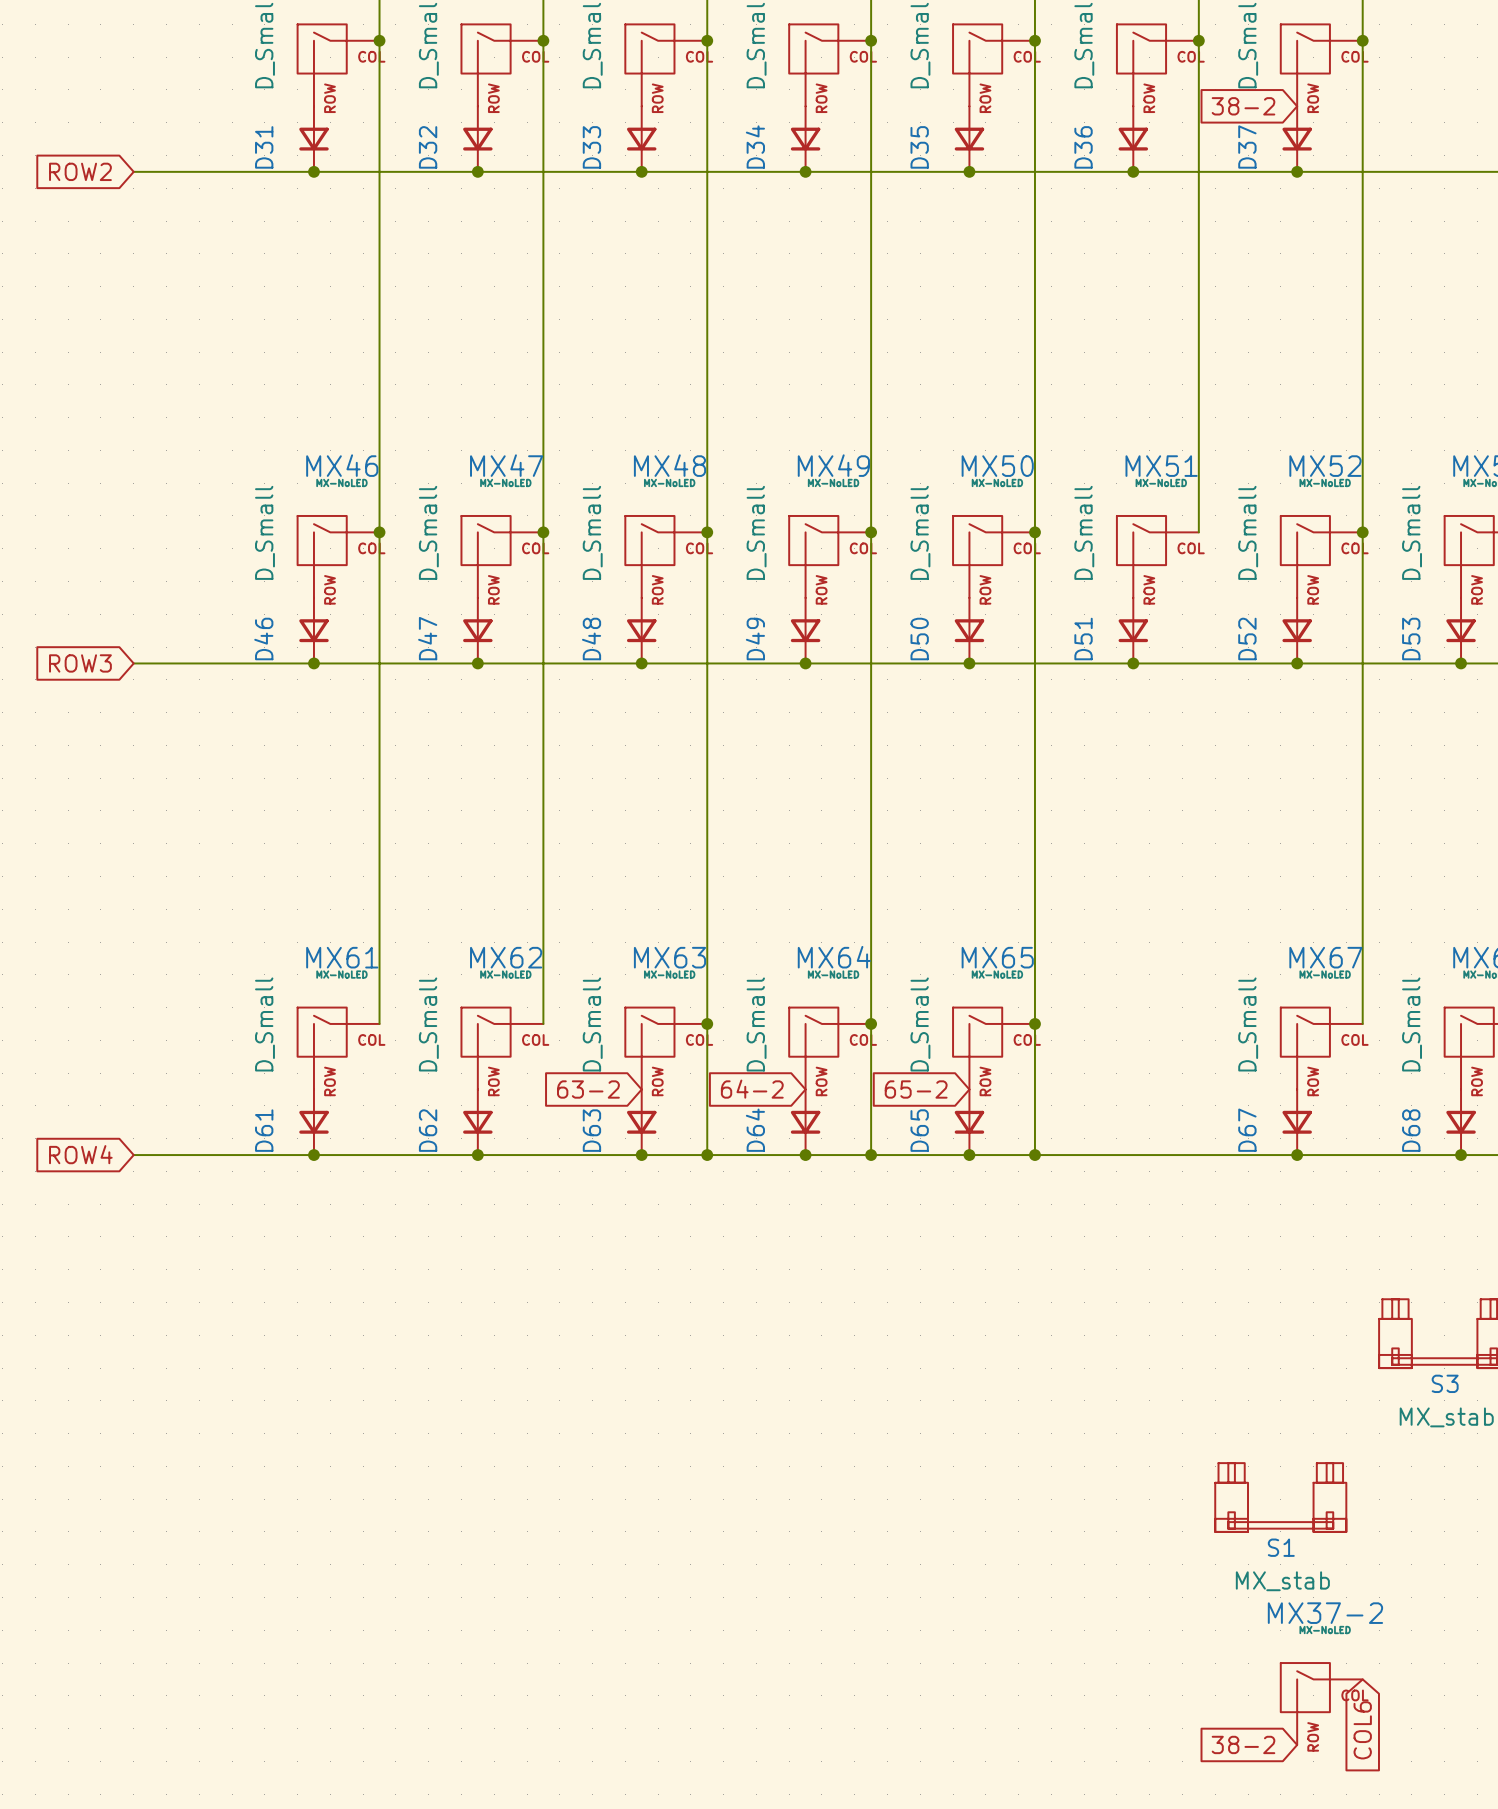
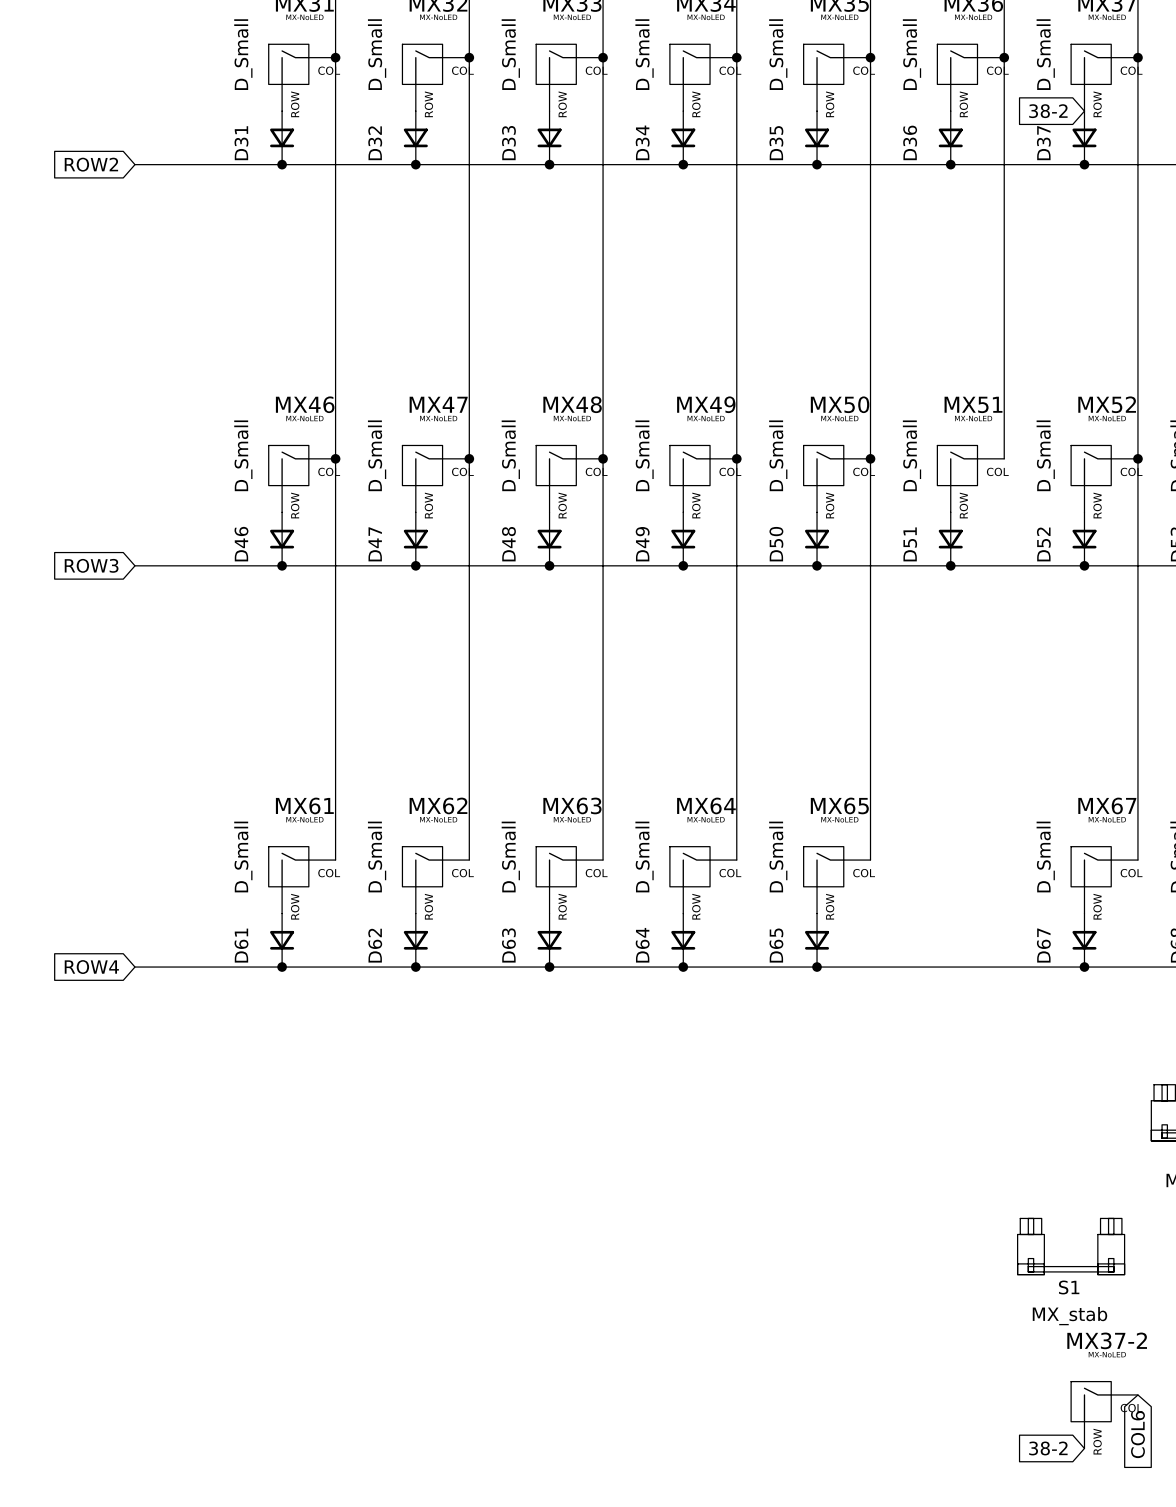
wire: (707, 1023) (707, 1155) -> none
junction: (707, 1023) -> none
wire: (871, 1023) (871, 1155) -> none
junction: (871, 1023) -> none
wire: (1034, 1023) (1034, 1155) -> none
junction: (1034, 1023) -> none
global label: 63-2 (588, 1089) -> none
global label: 64-2 (752, 1089) -> none
global label: 65-2 (916, 1089) -> none
junction: (707, 1155) -> none
junction: (871, 1155) -> none
junction: (1034, 1155) -> none

